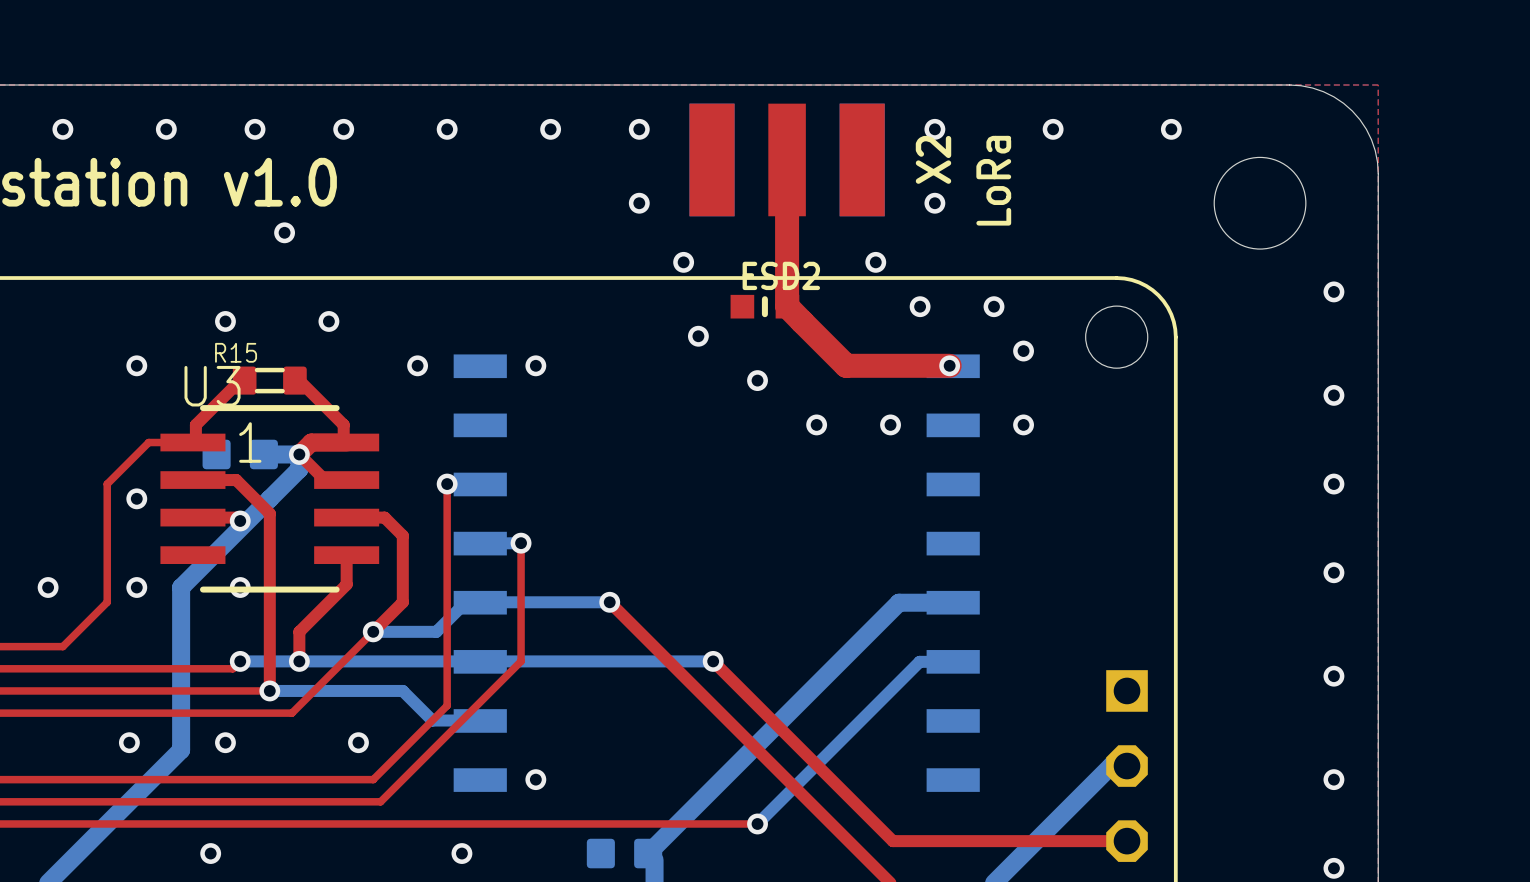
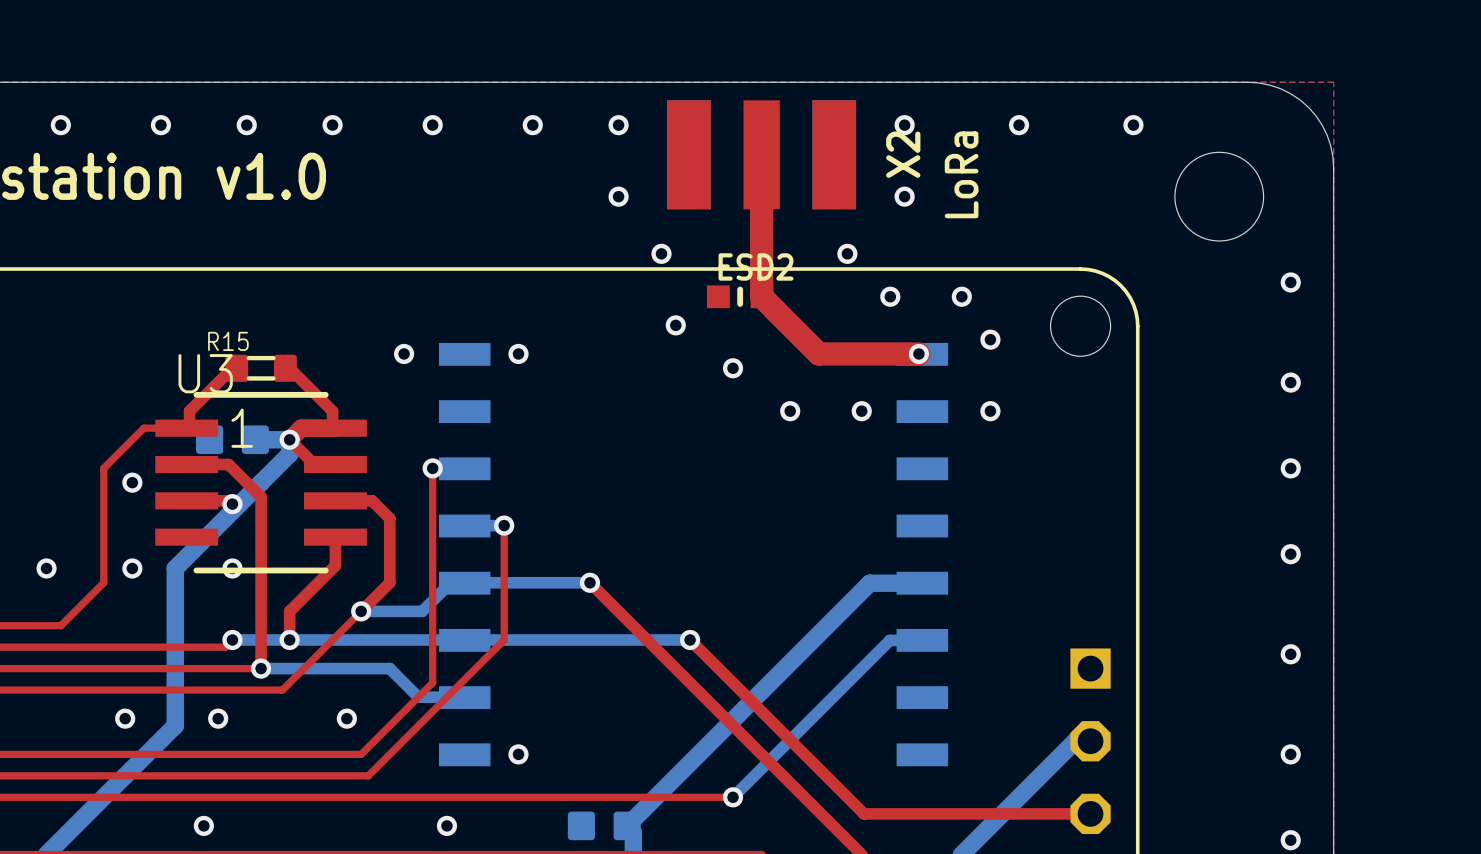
via: (284, 232) -> none
via: (225, 321) -> none
via: (328, 321) -> none
via: (136, 365) -> none

